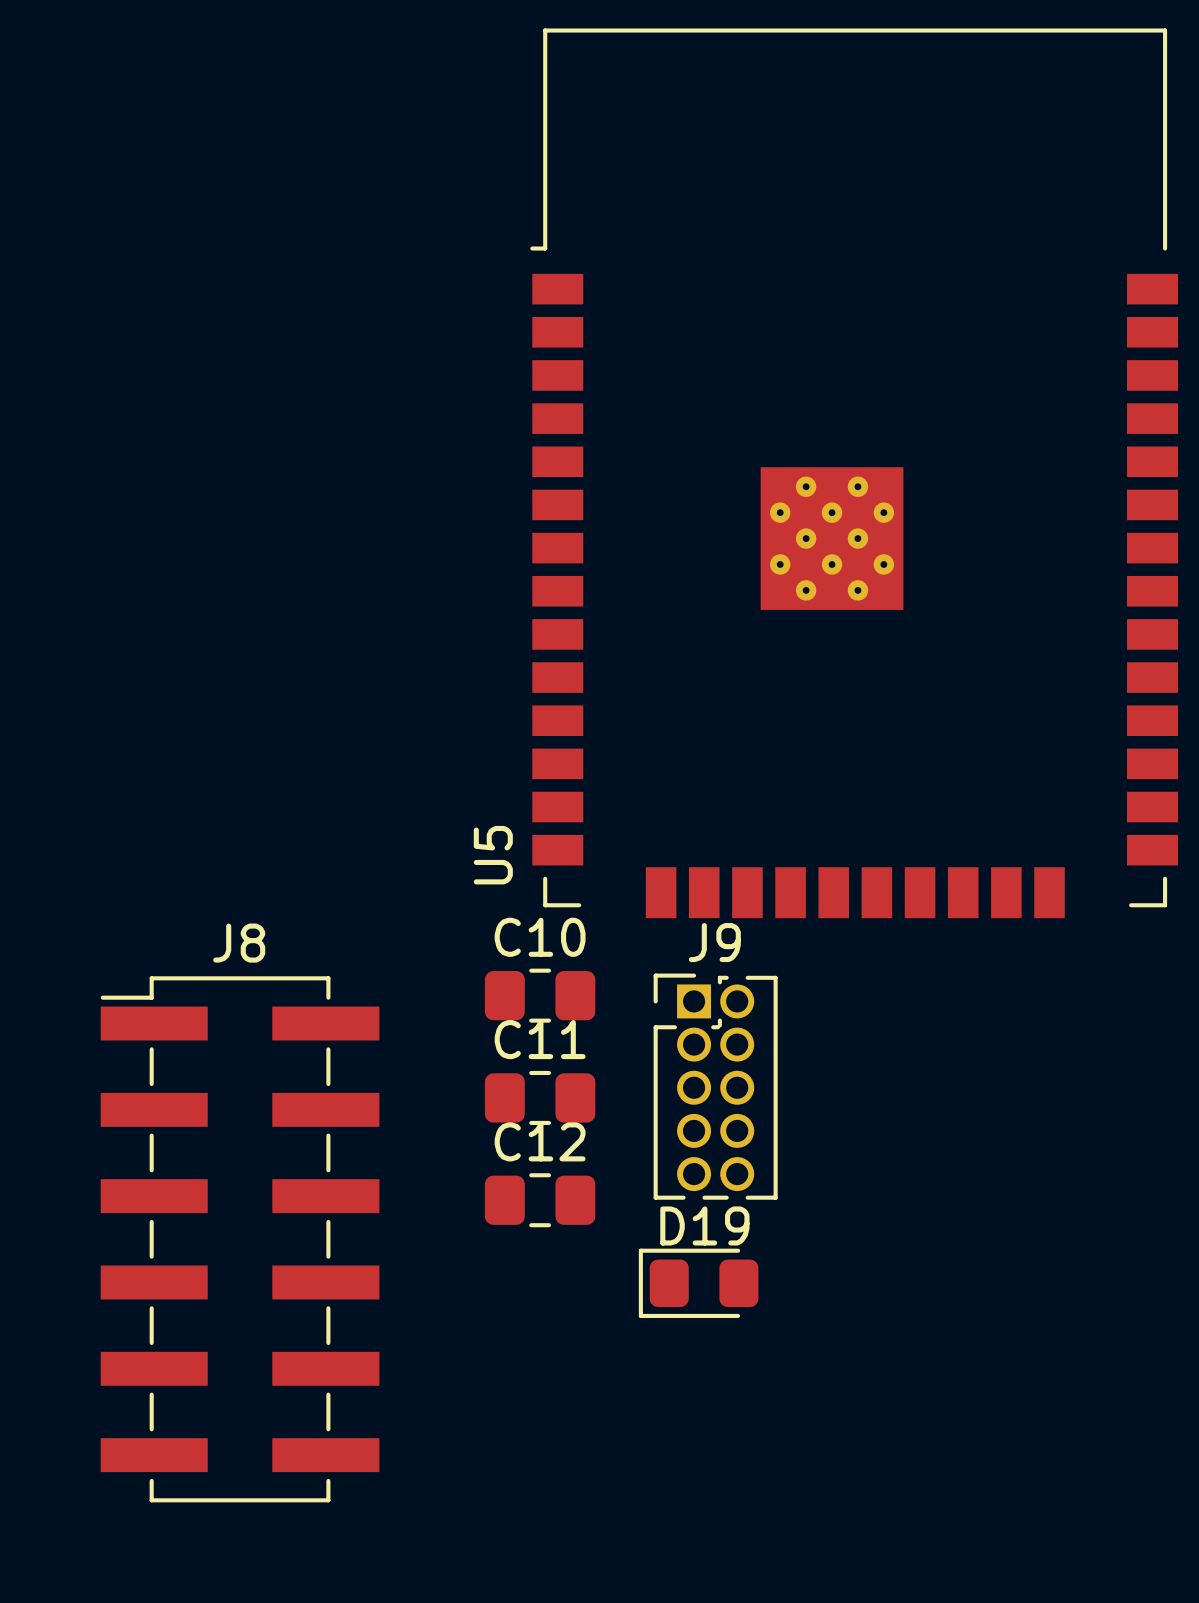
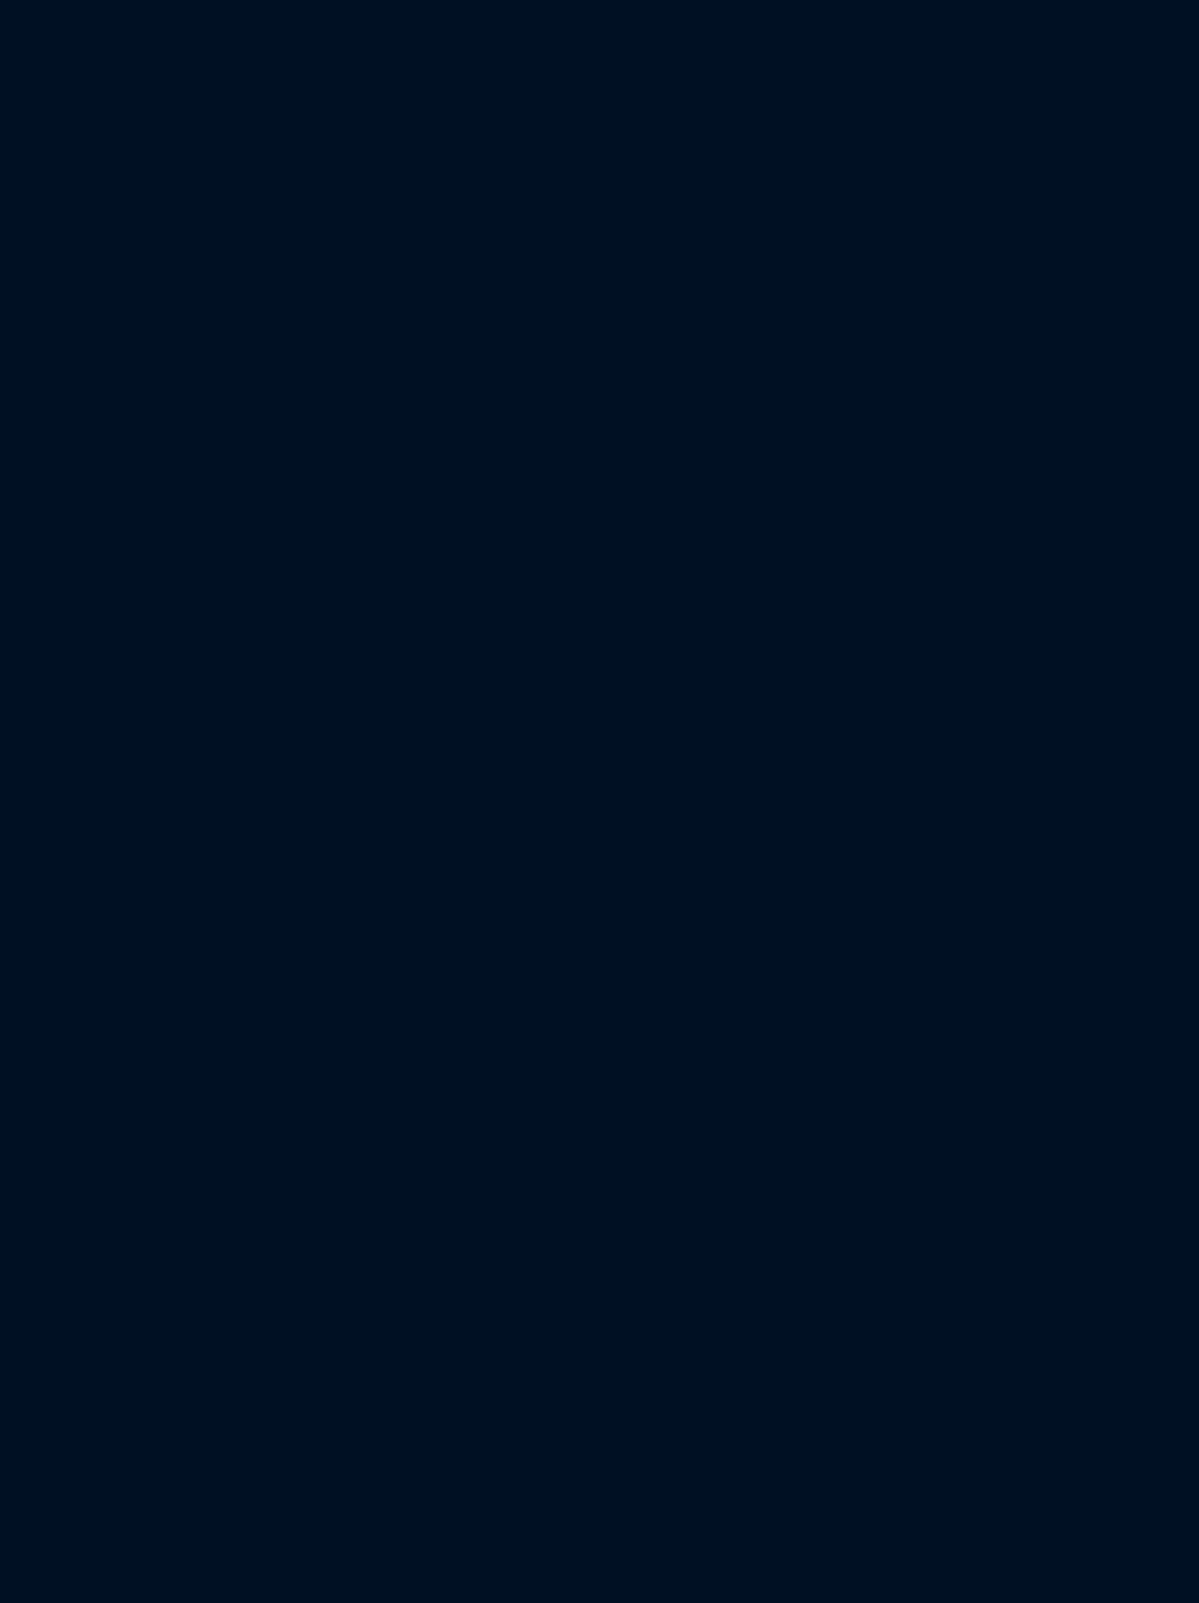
U5: (854, 473) -> none
C10: (540, 995) -> none
J9: (715, 1086) -> none
C11: (540, 1097) -> none
C12: (540, 1200) -> none
J8: (240, 1239) -> none
D19: (698, 1283) -> none

